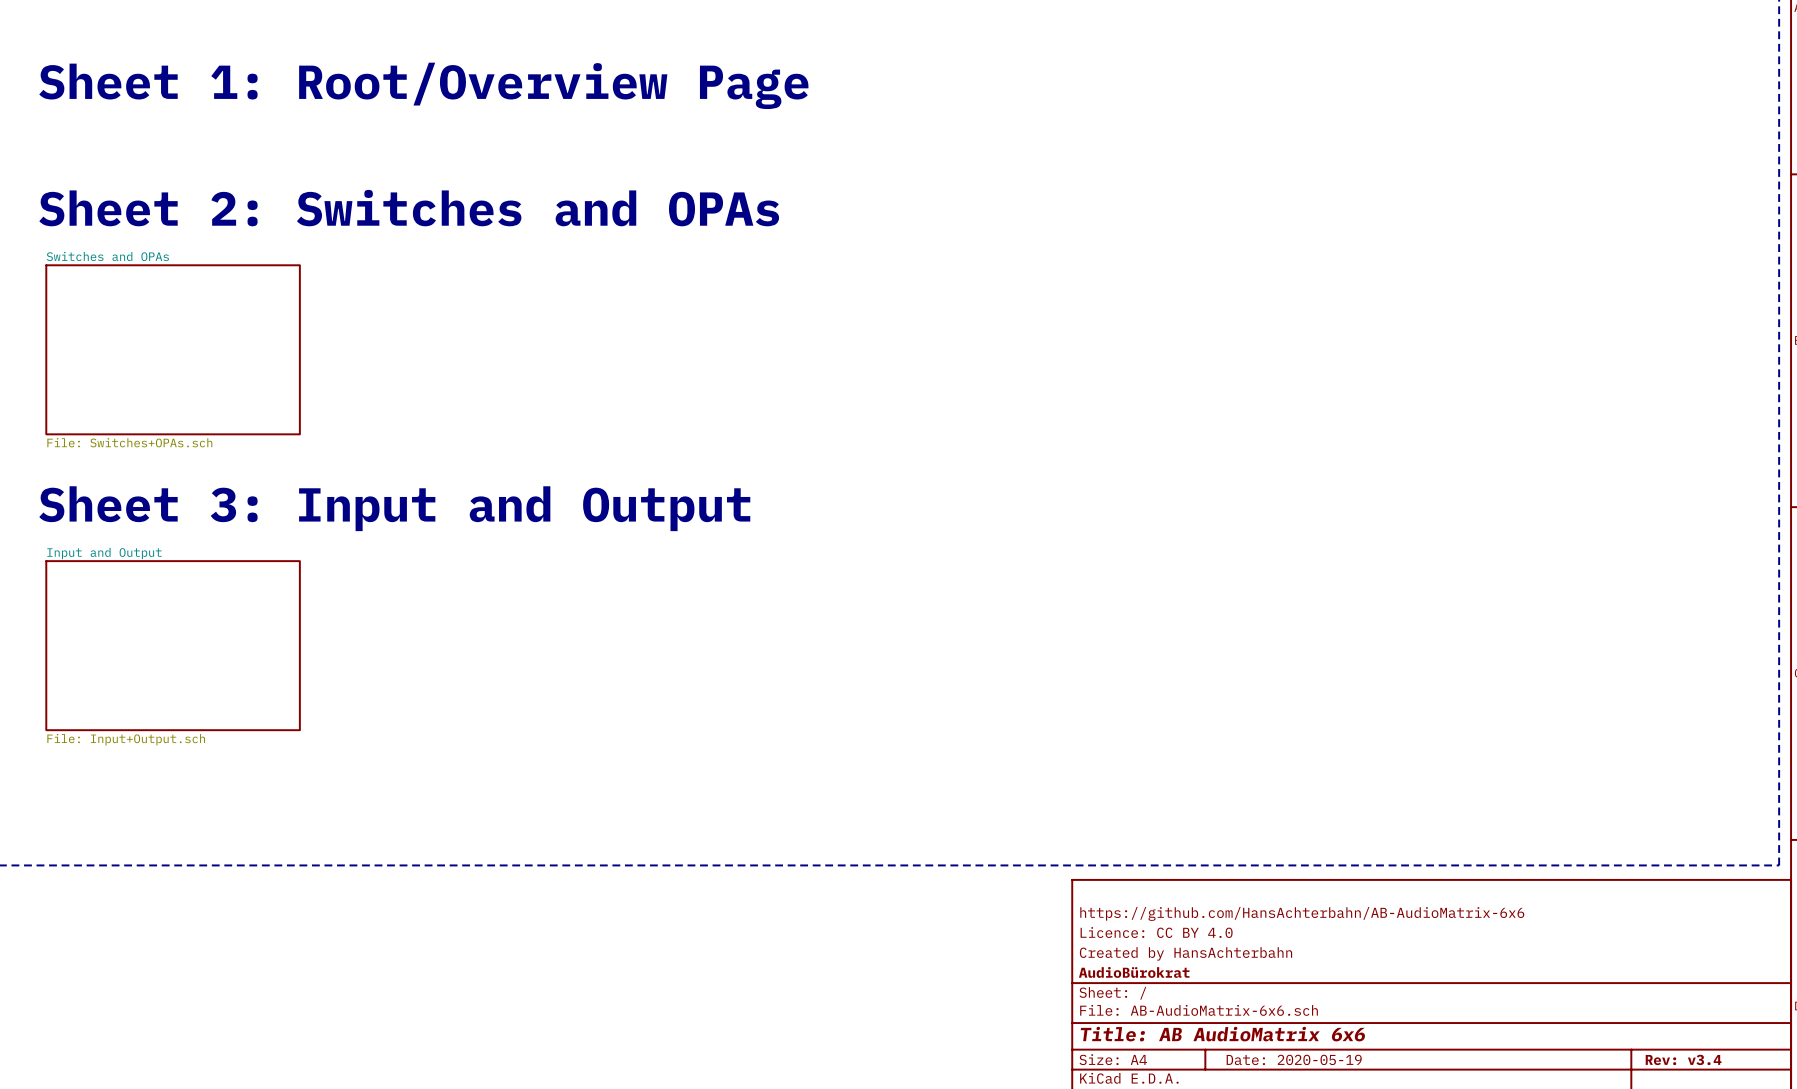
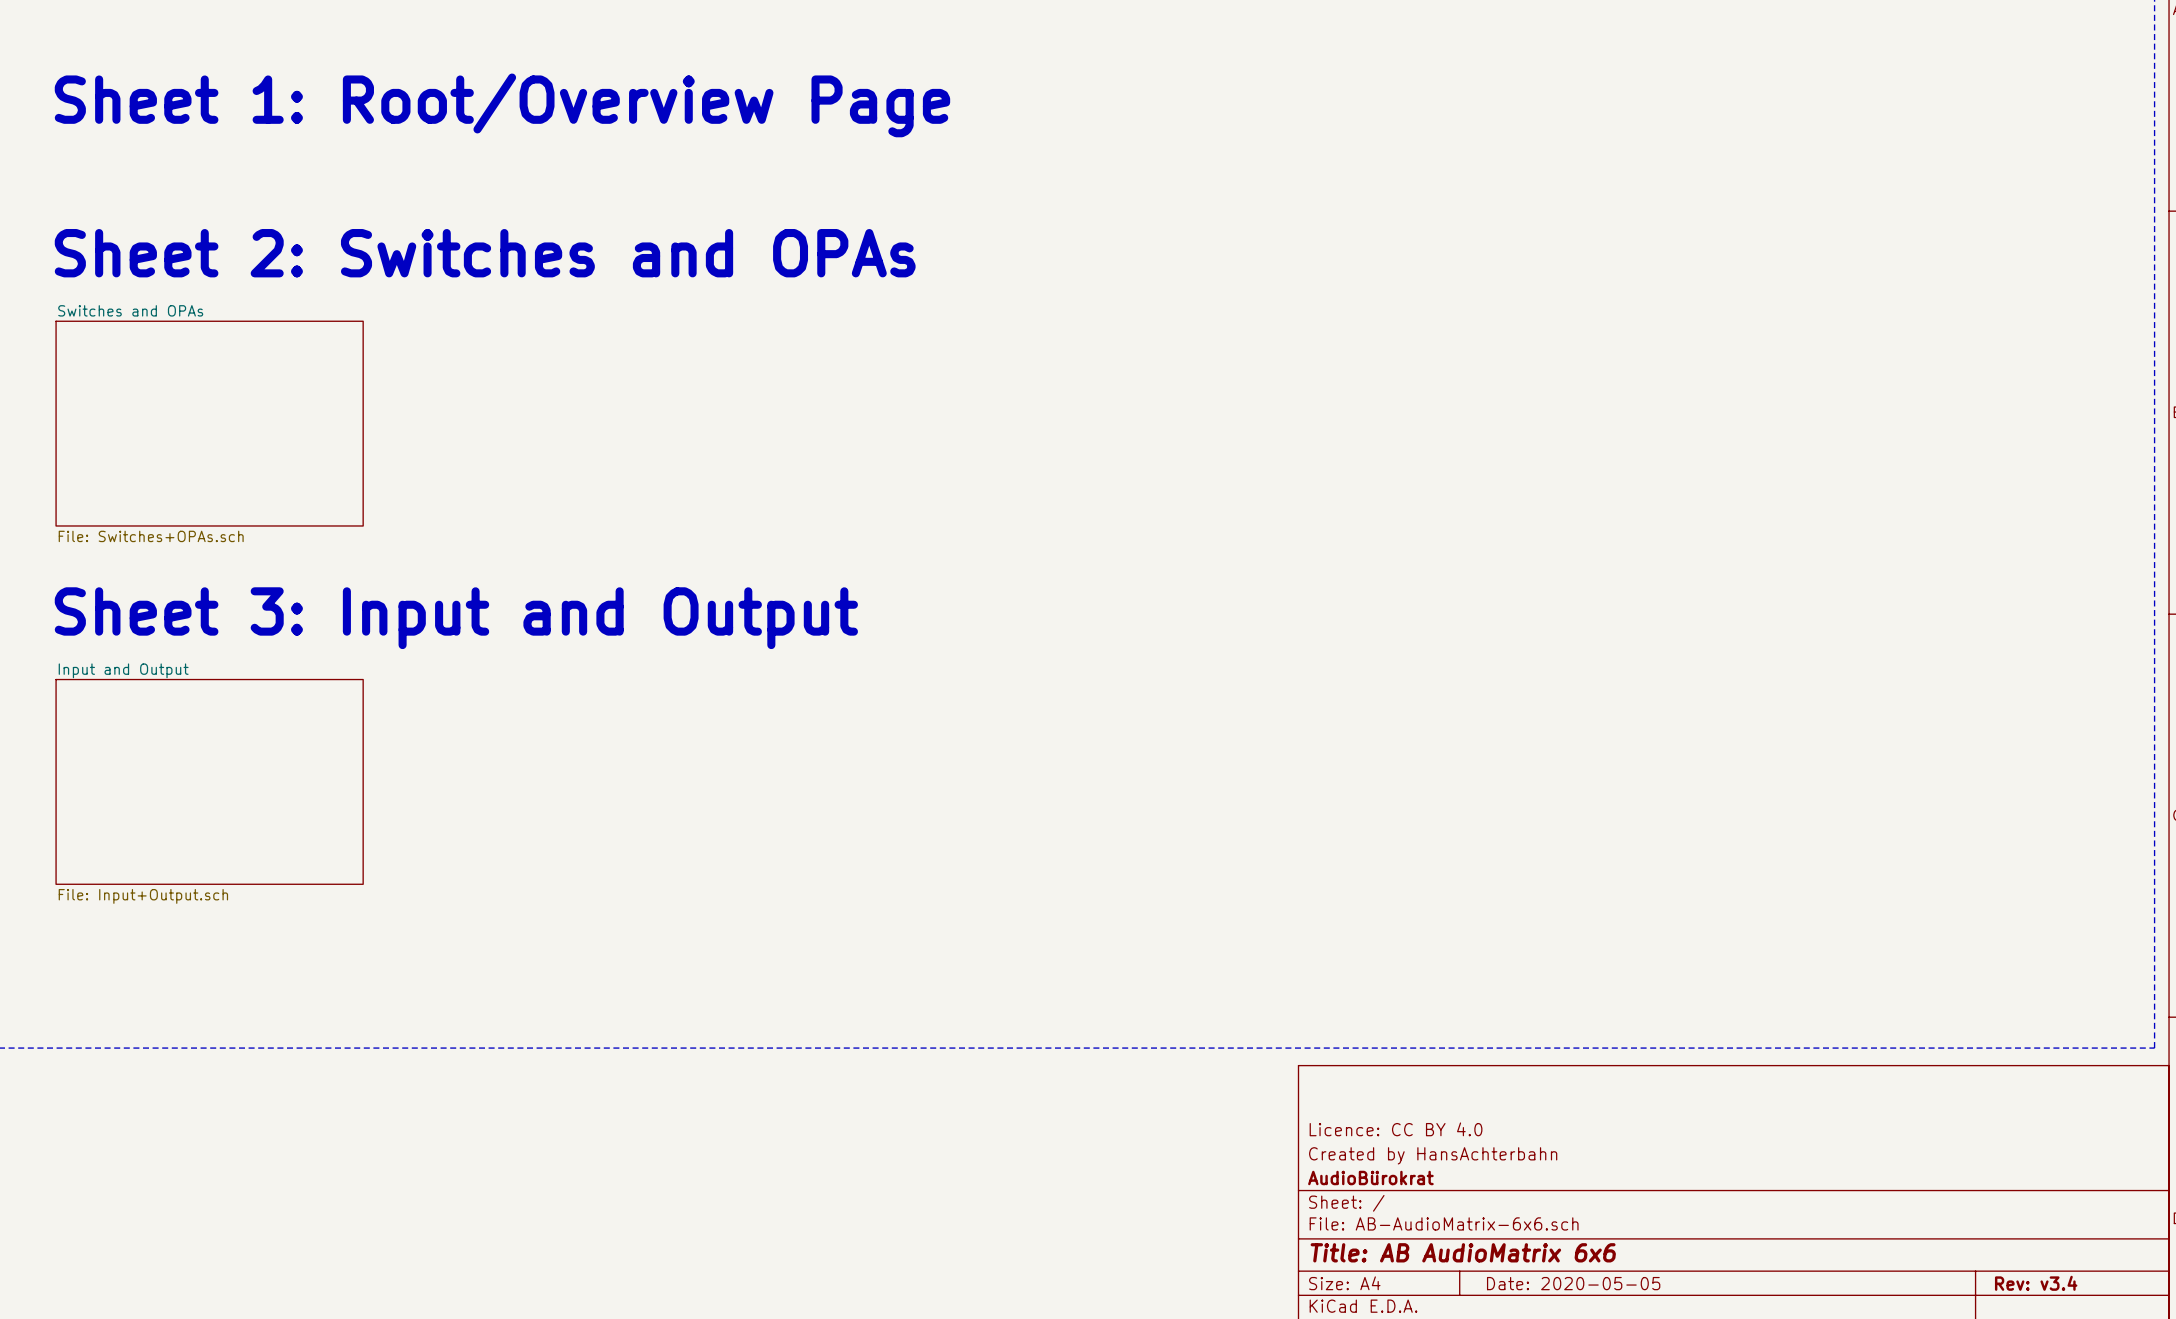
title block: https://github.com/HansAchterbahn/AB-AudioMatrix-6x6 (1302, 913) -> none
title block: Date: 2020-05-19 (1294, 1059) -> Date: 2020-05-05 (1573, 1283)

